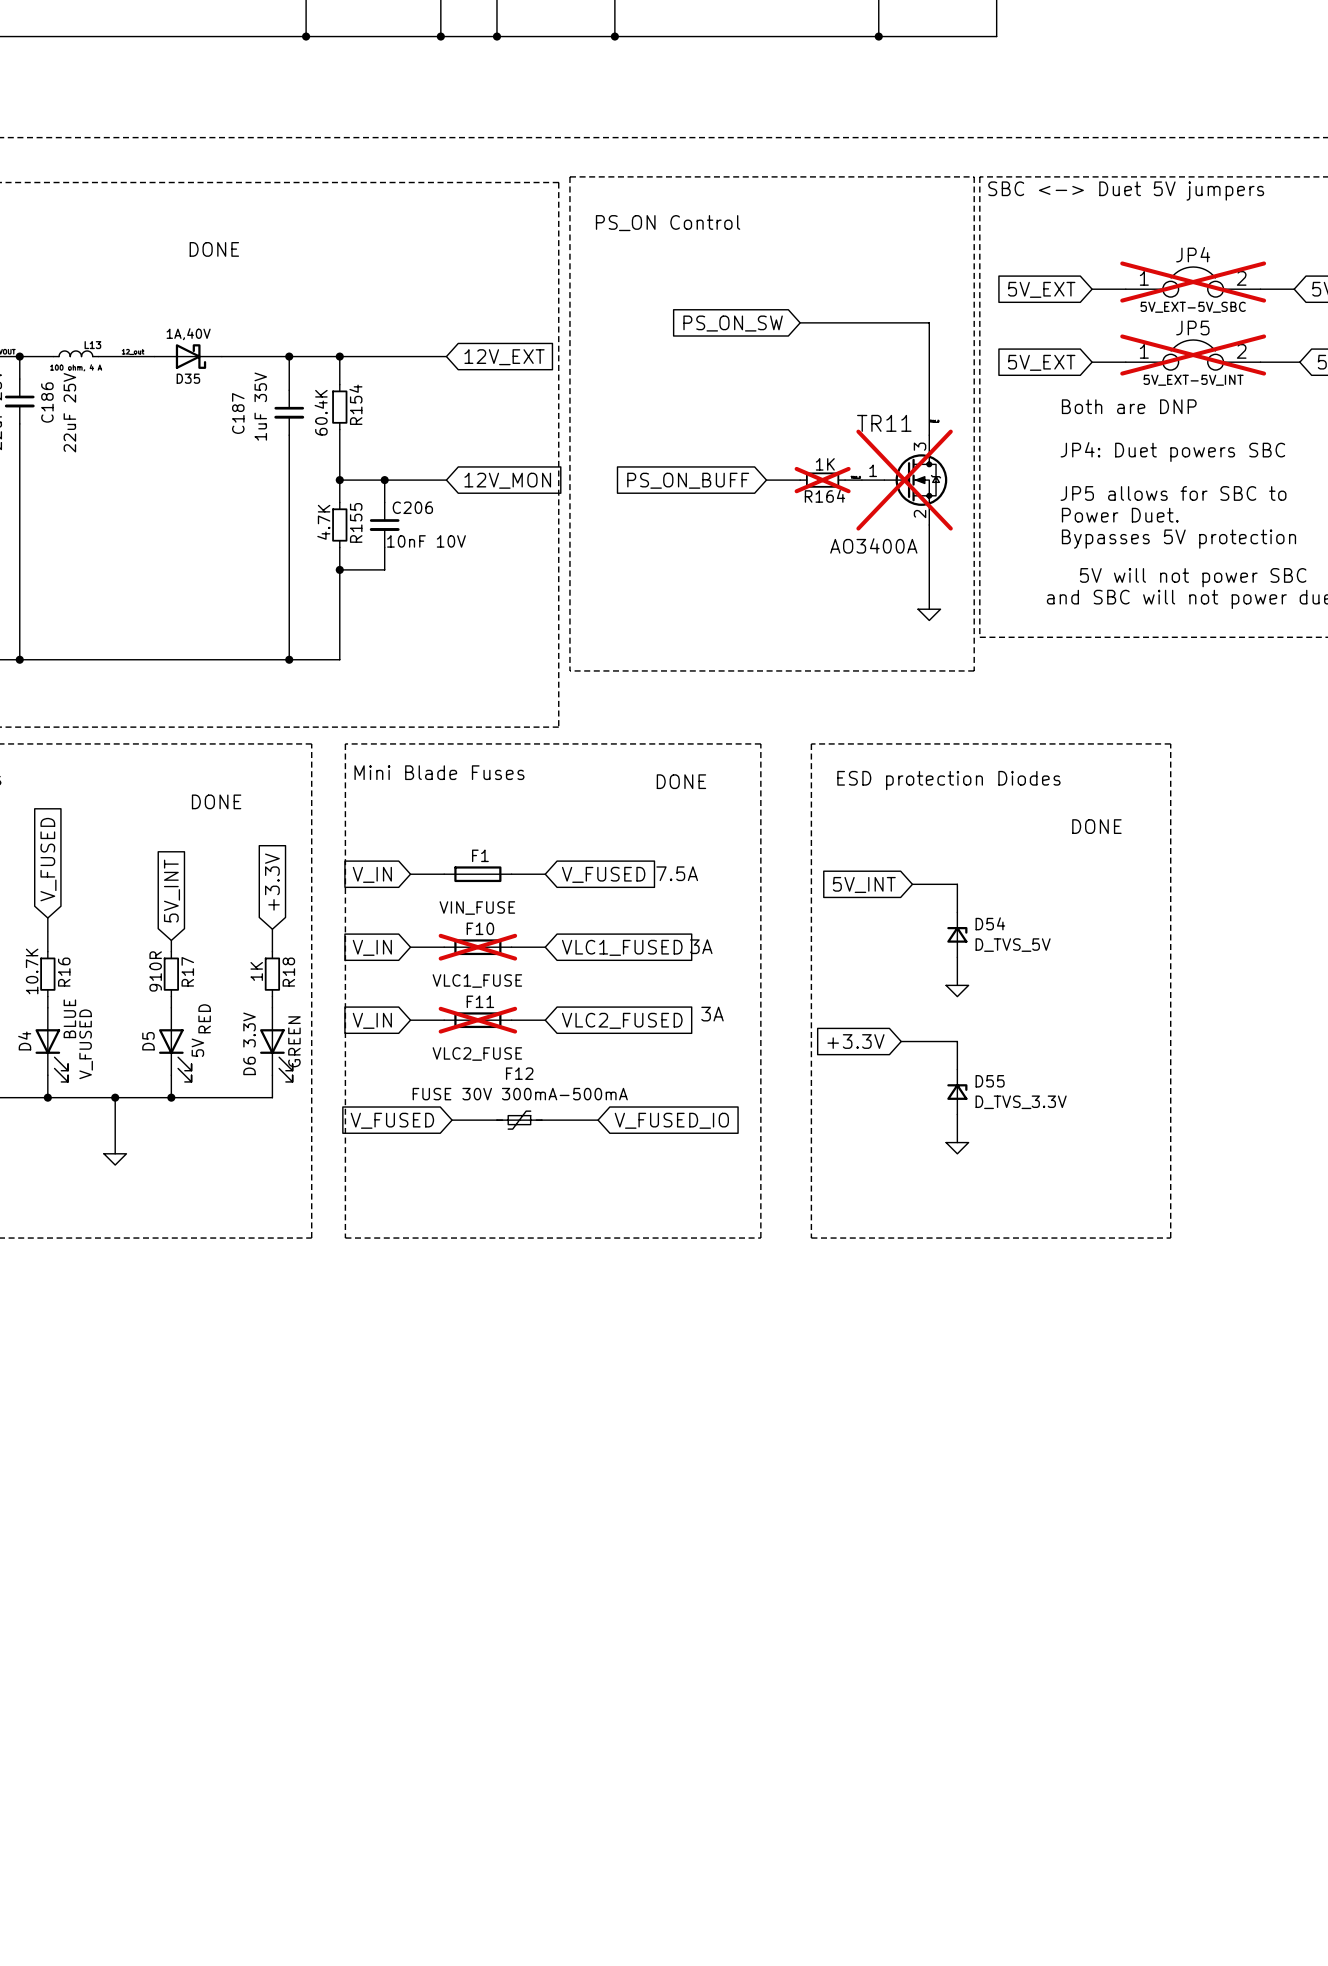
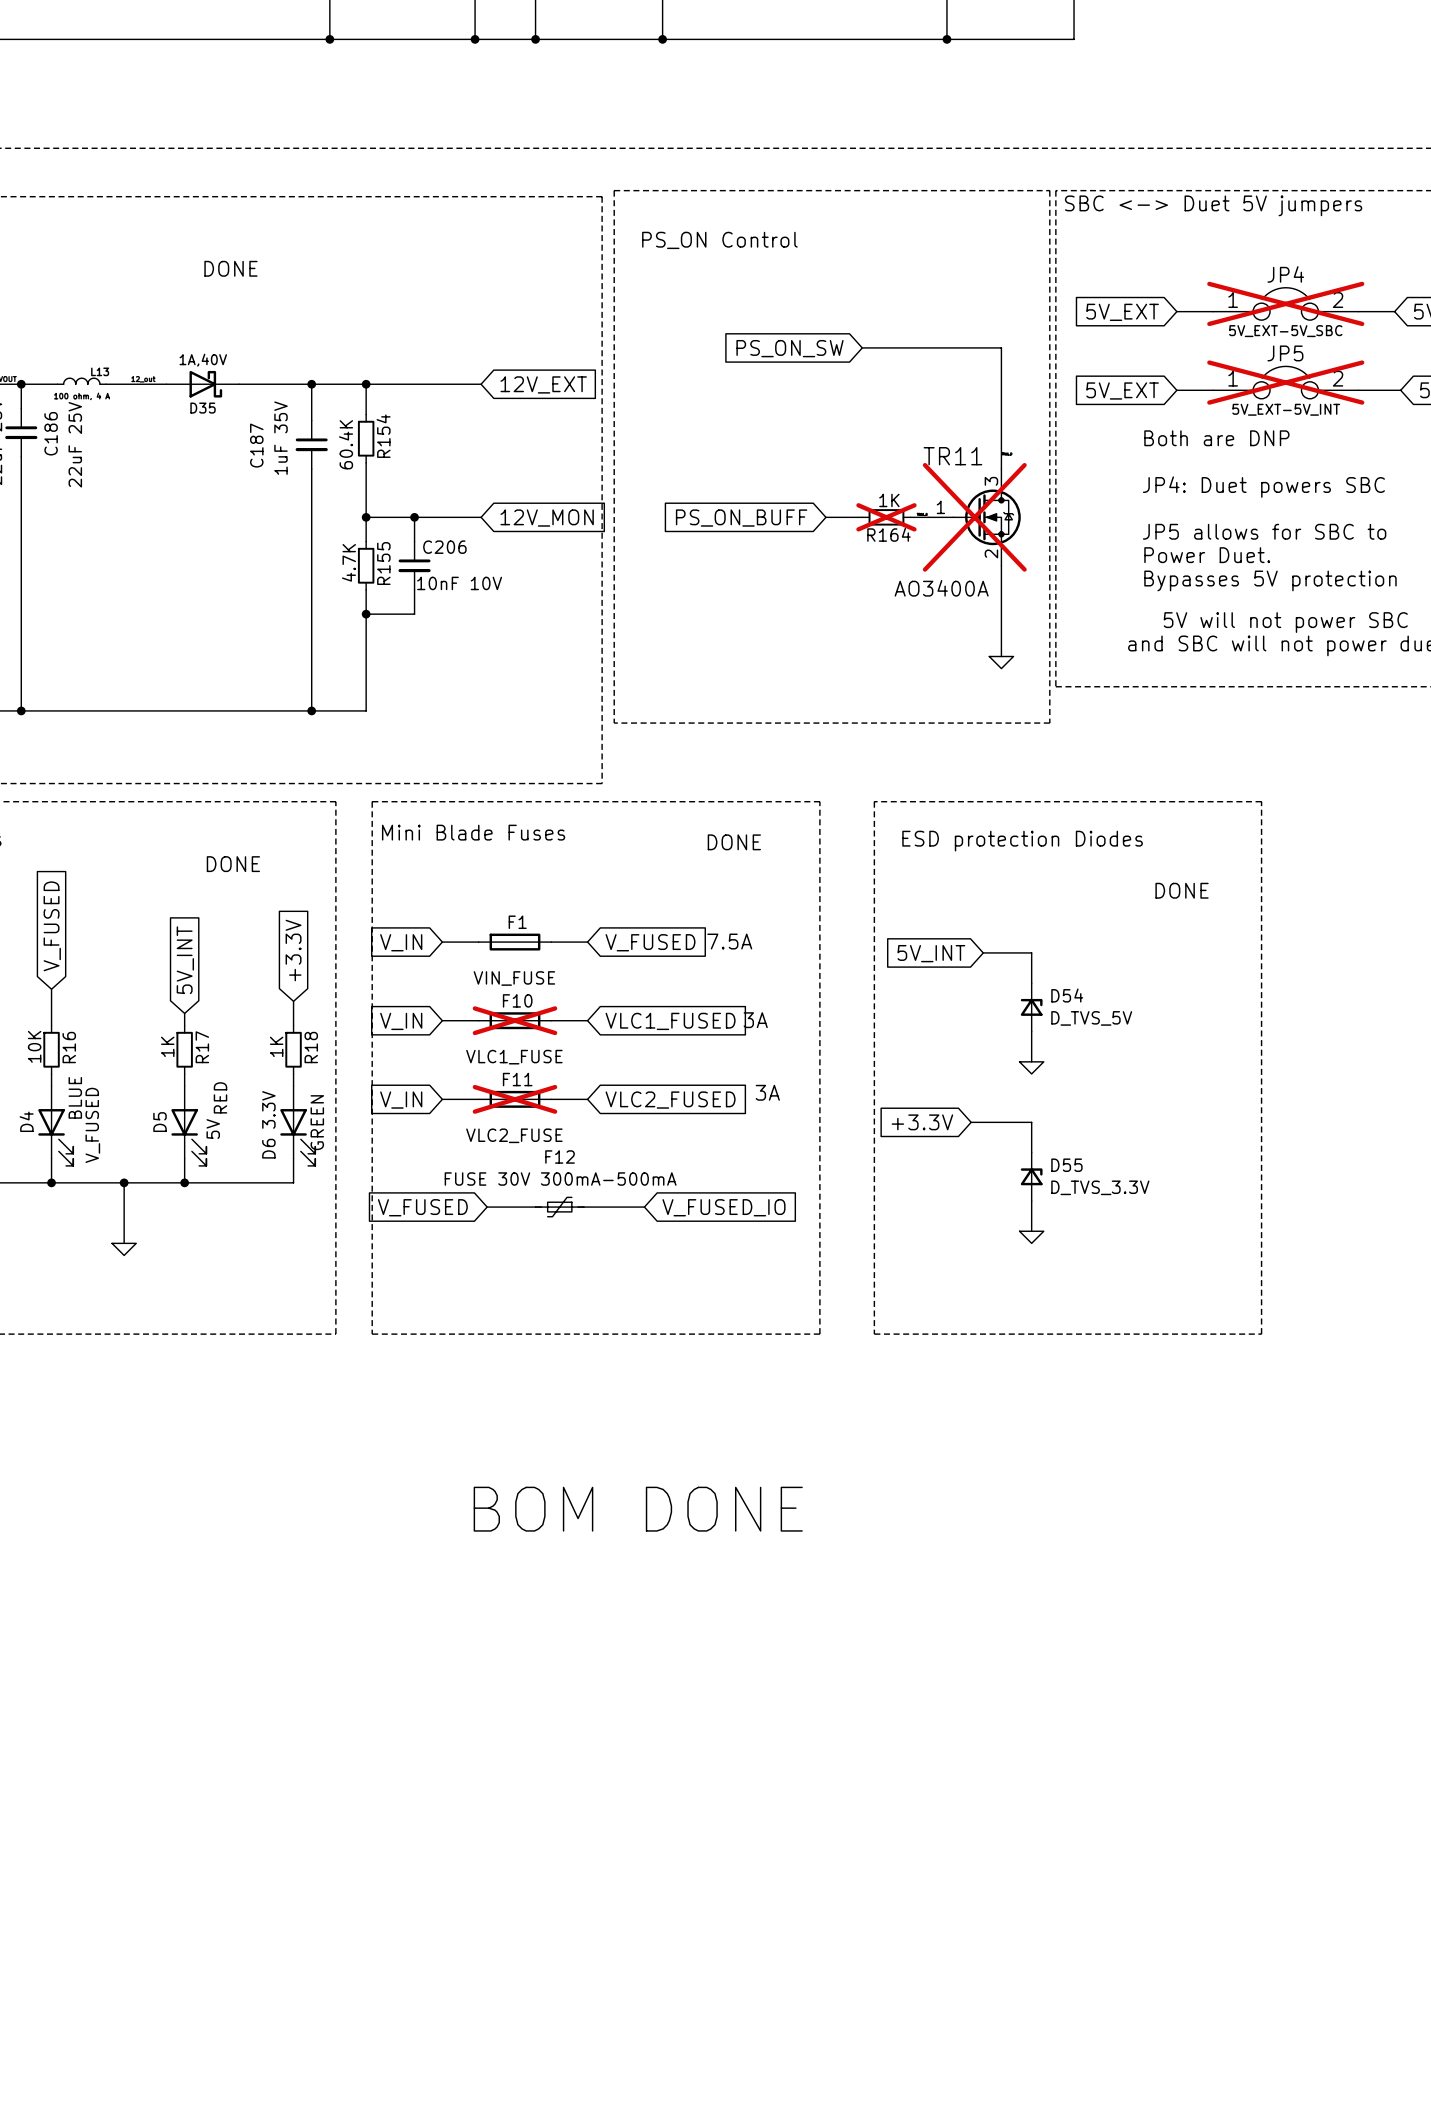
R16 value: 10.7K (32, 971) -> 10K (34, 1046)
R17 value: 910R (155, 971) -> 1K (167, 1046)
text: none -> BOM DONE (638, 1509)

